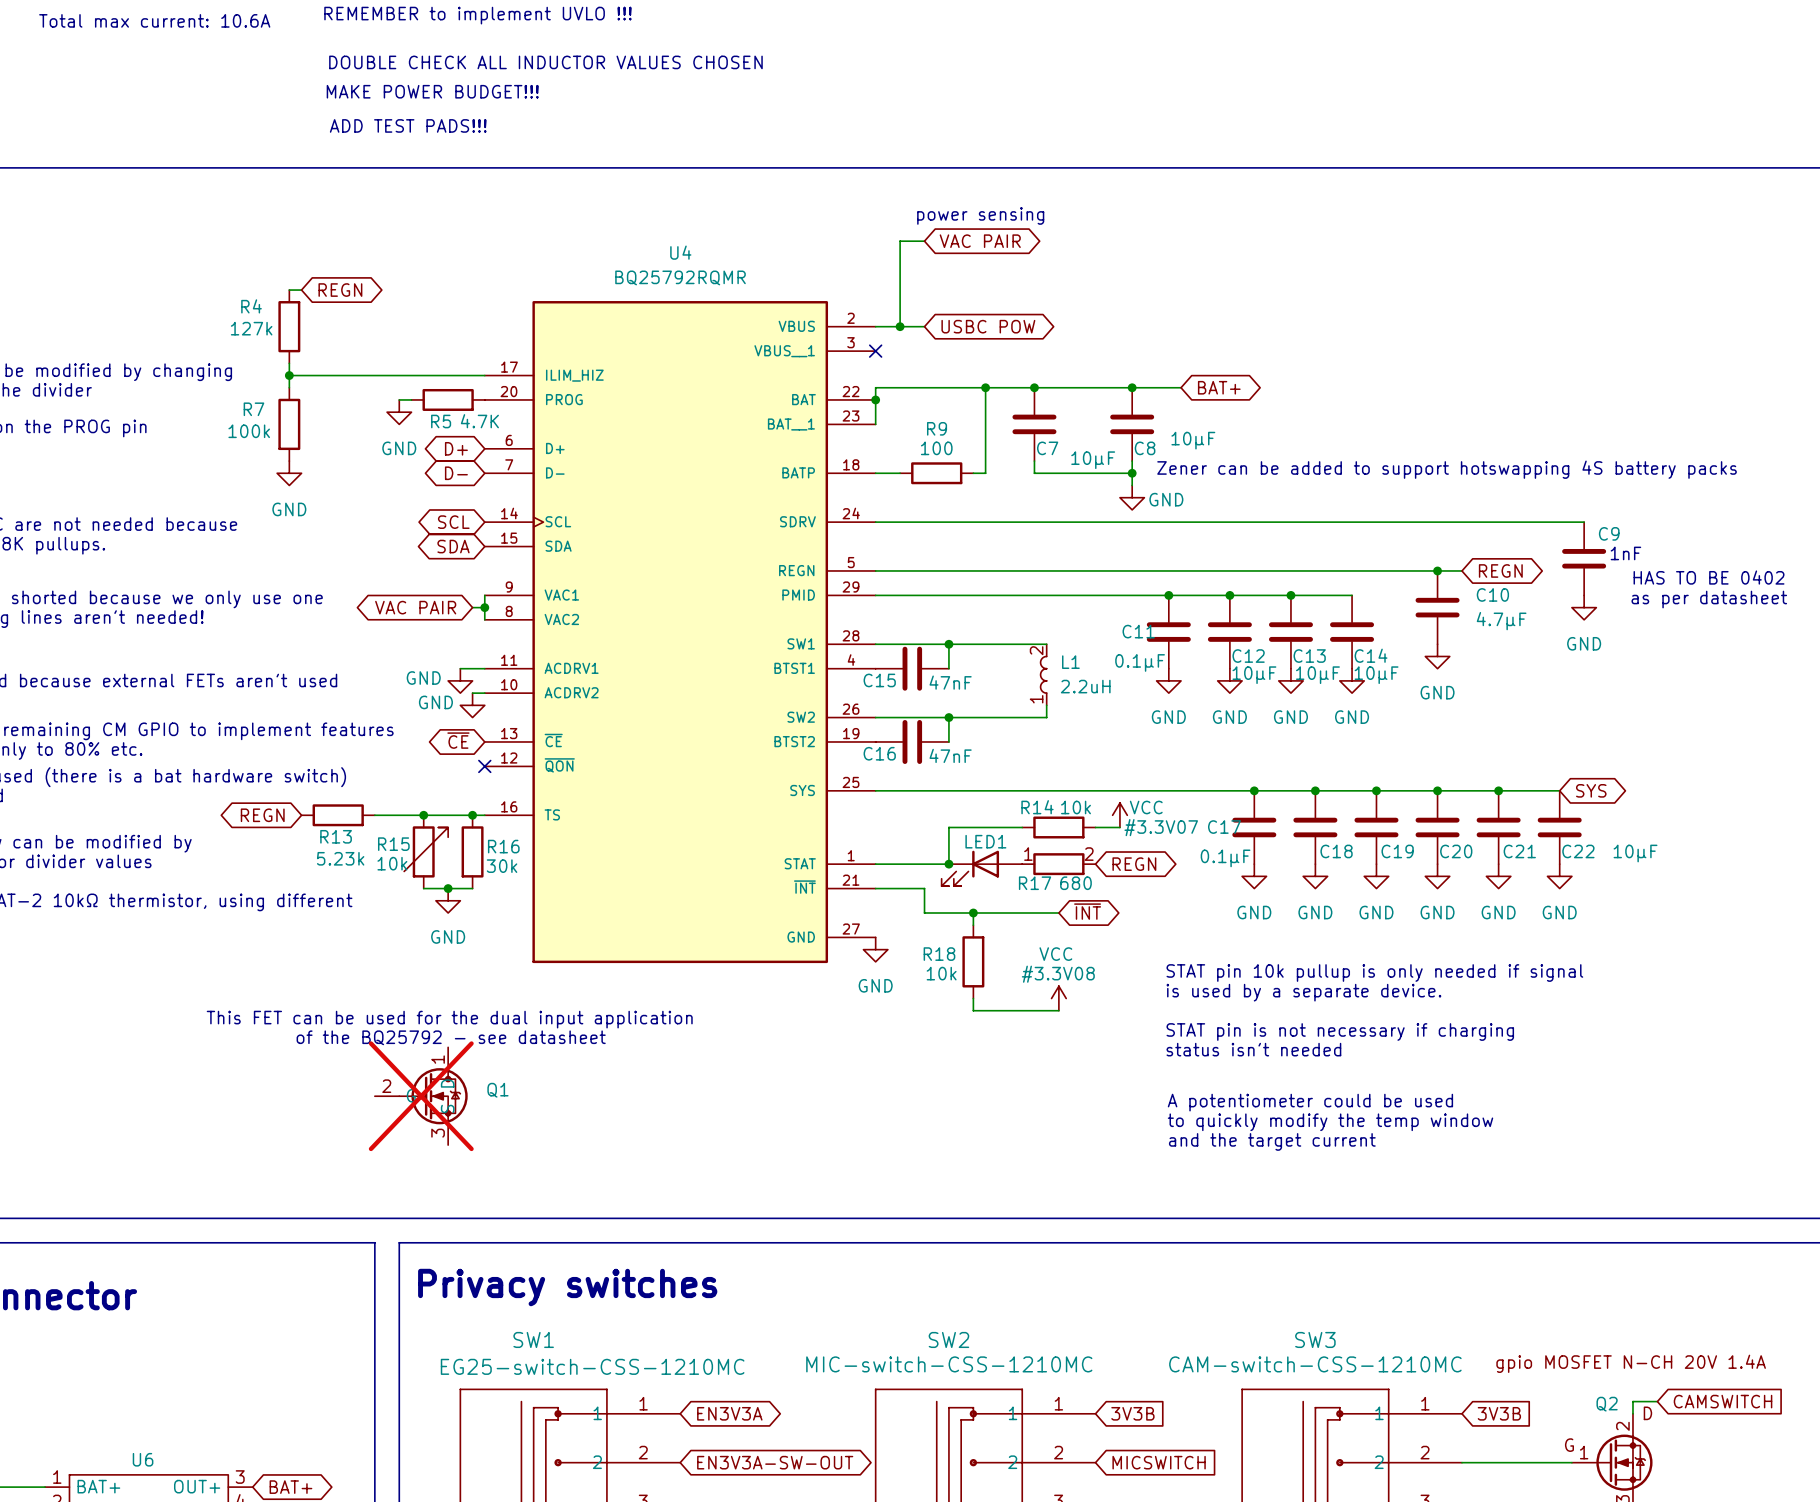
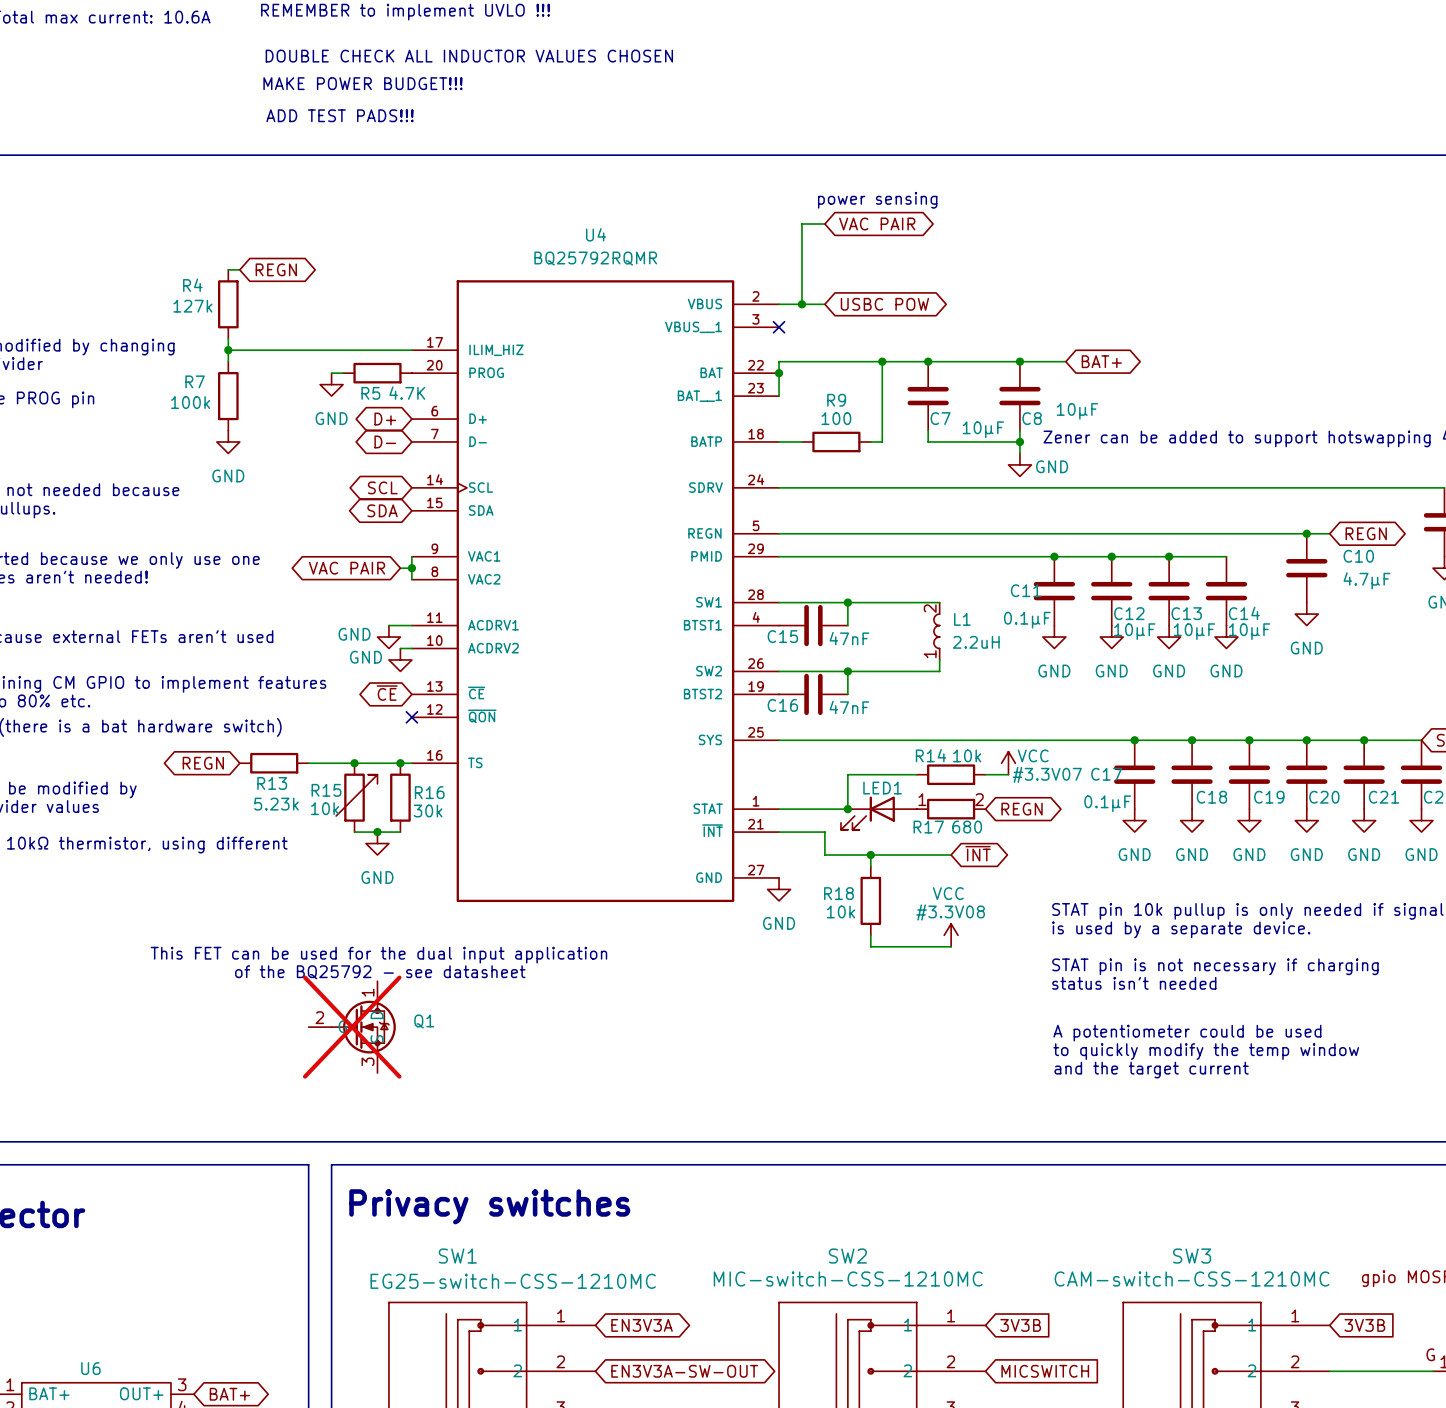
U4 symbol: [484, 301, 876, 964] -> [411, 280, 780, 903]

